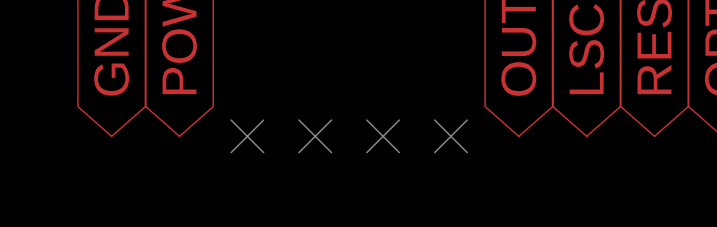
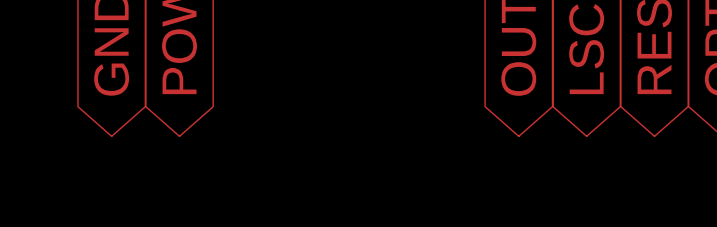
no-connect mark: (247, 136) -> none
no-connect mark: (315, 136) -> none
no-connect mark: (383, 136) -> none
no-connect mark: (450, 136) -> none

